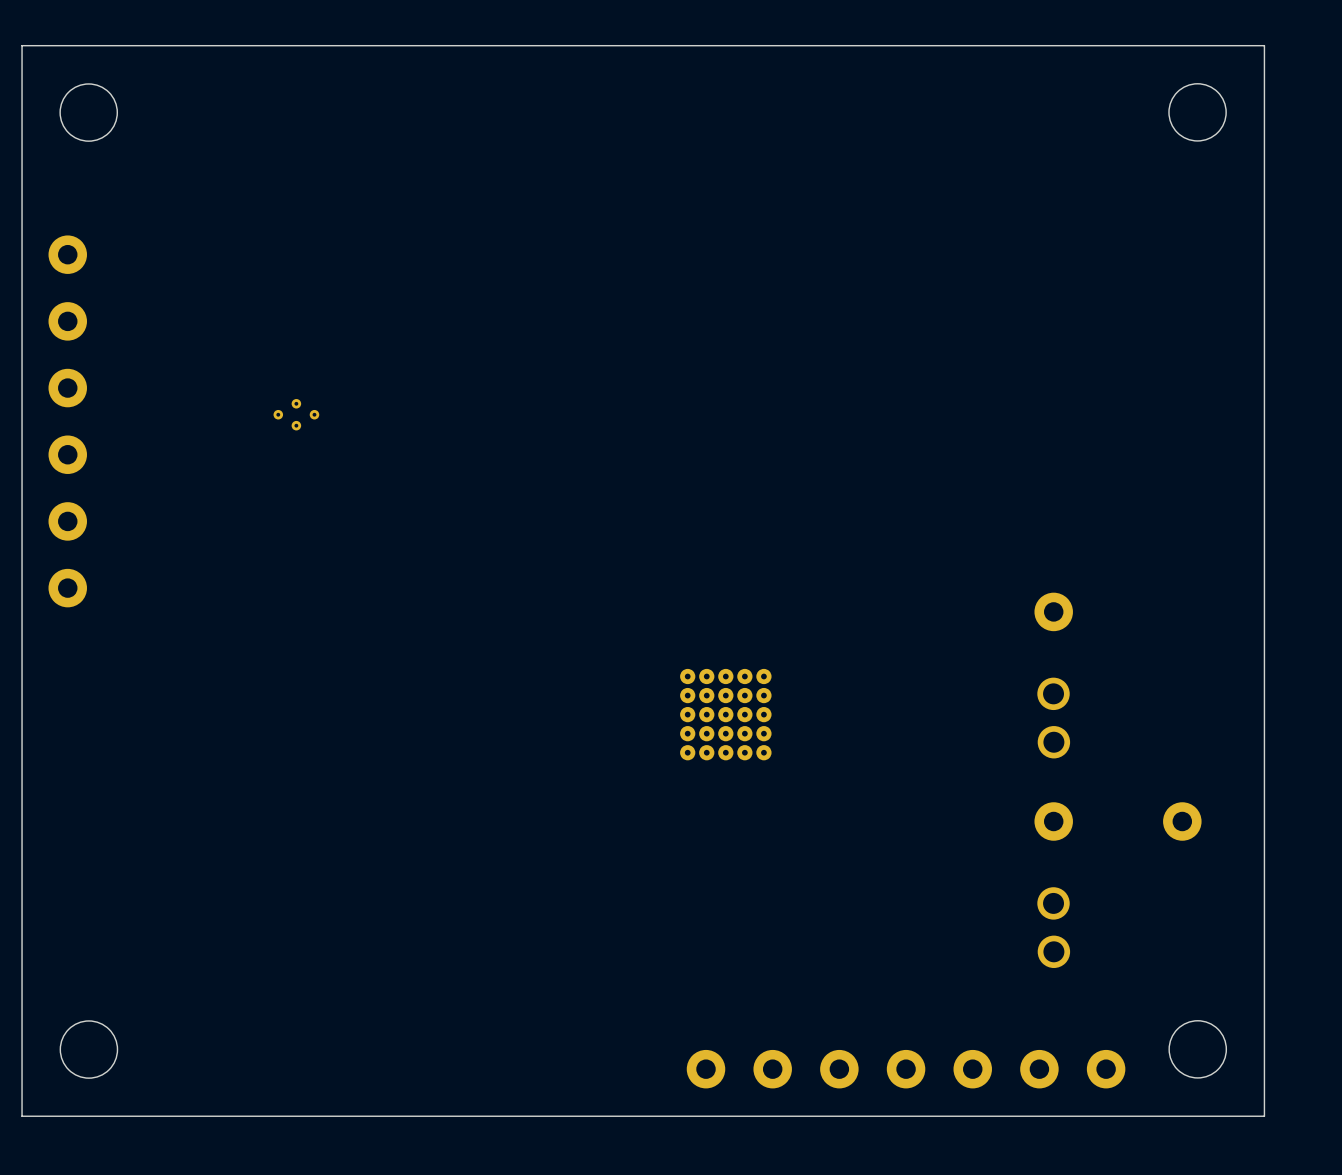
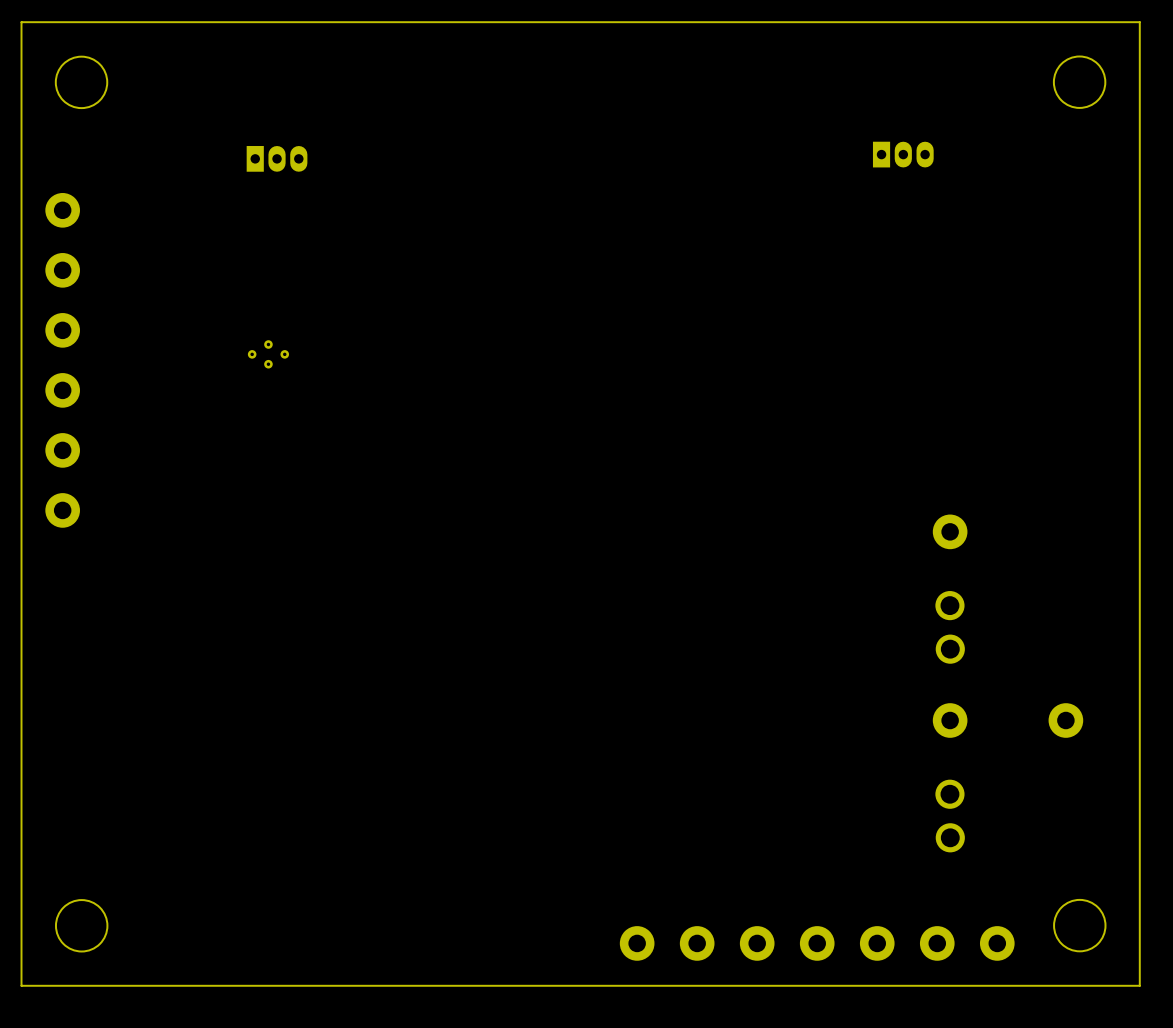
part: none -> (903, 154)
part: none -> (277, 158)
part: (725, 714) -> none

